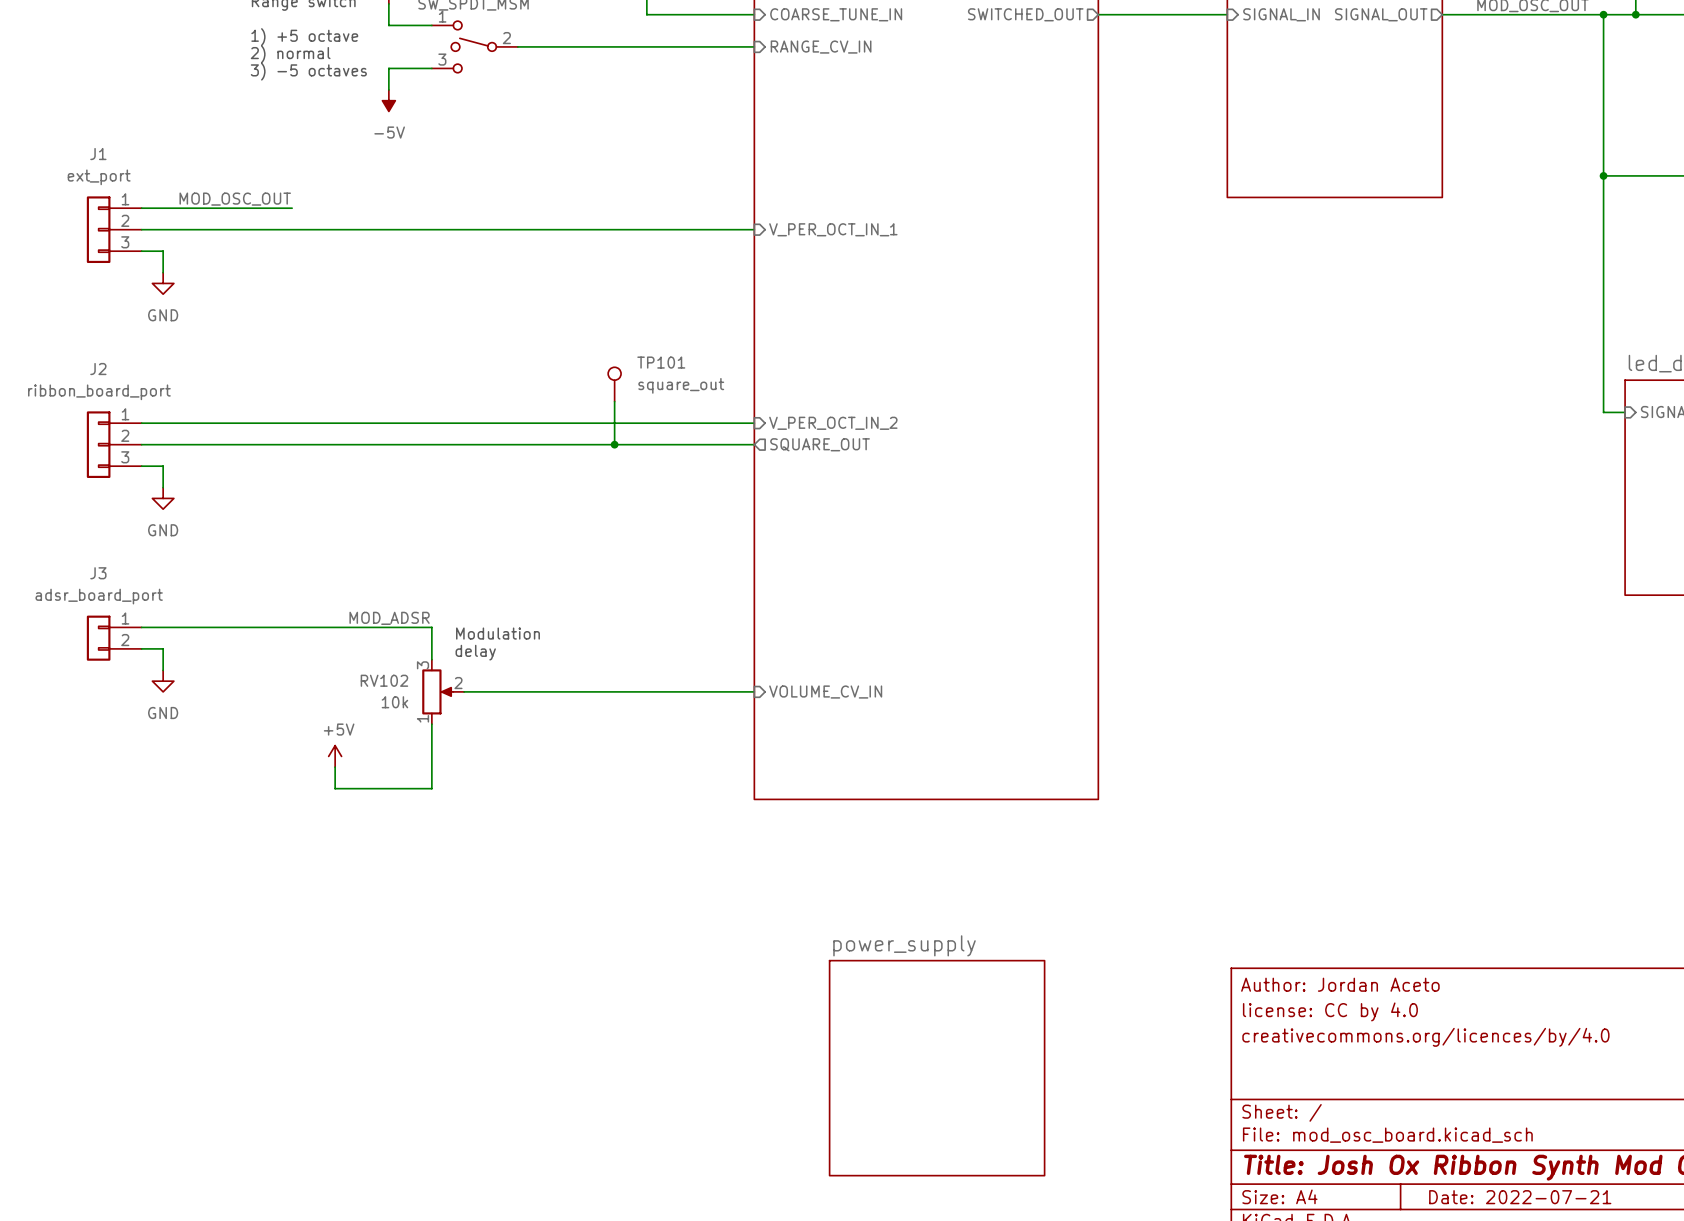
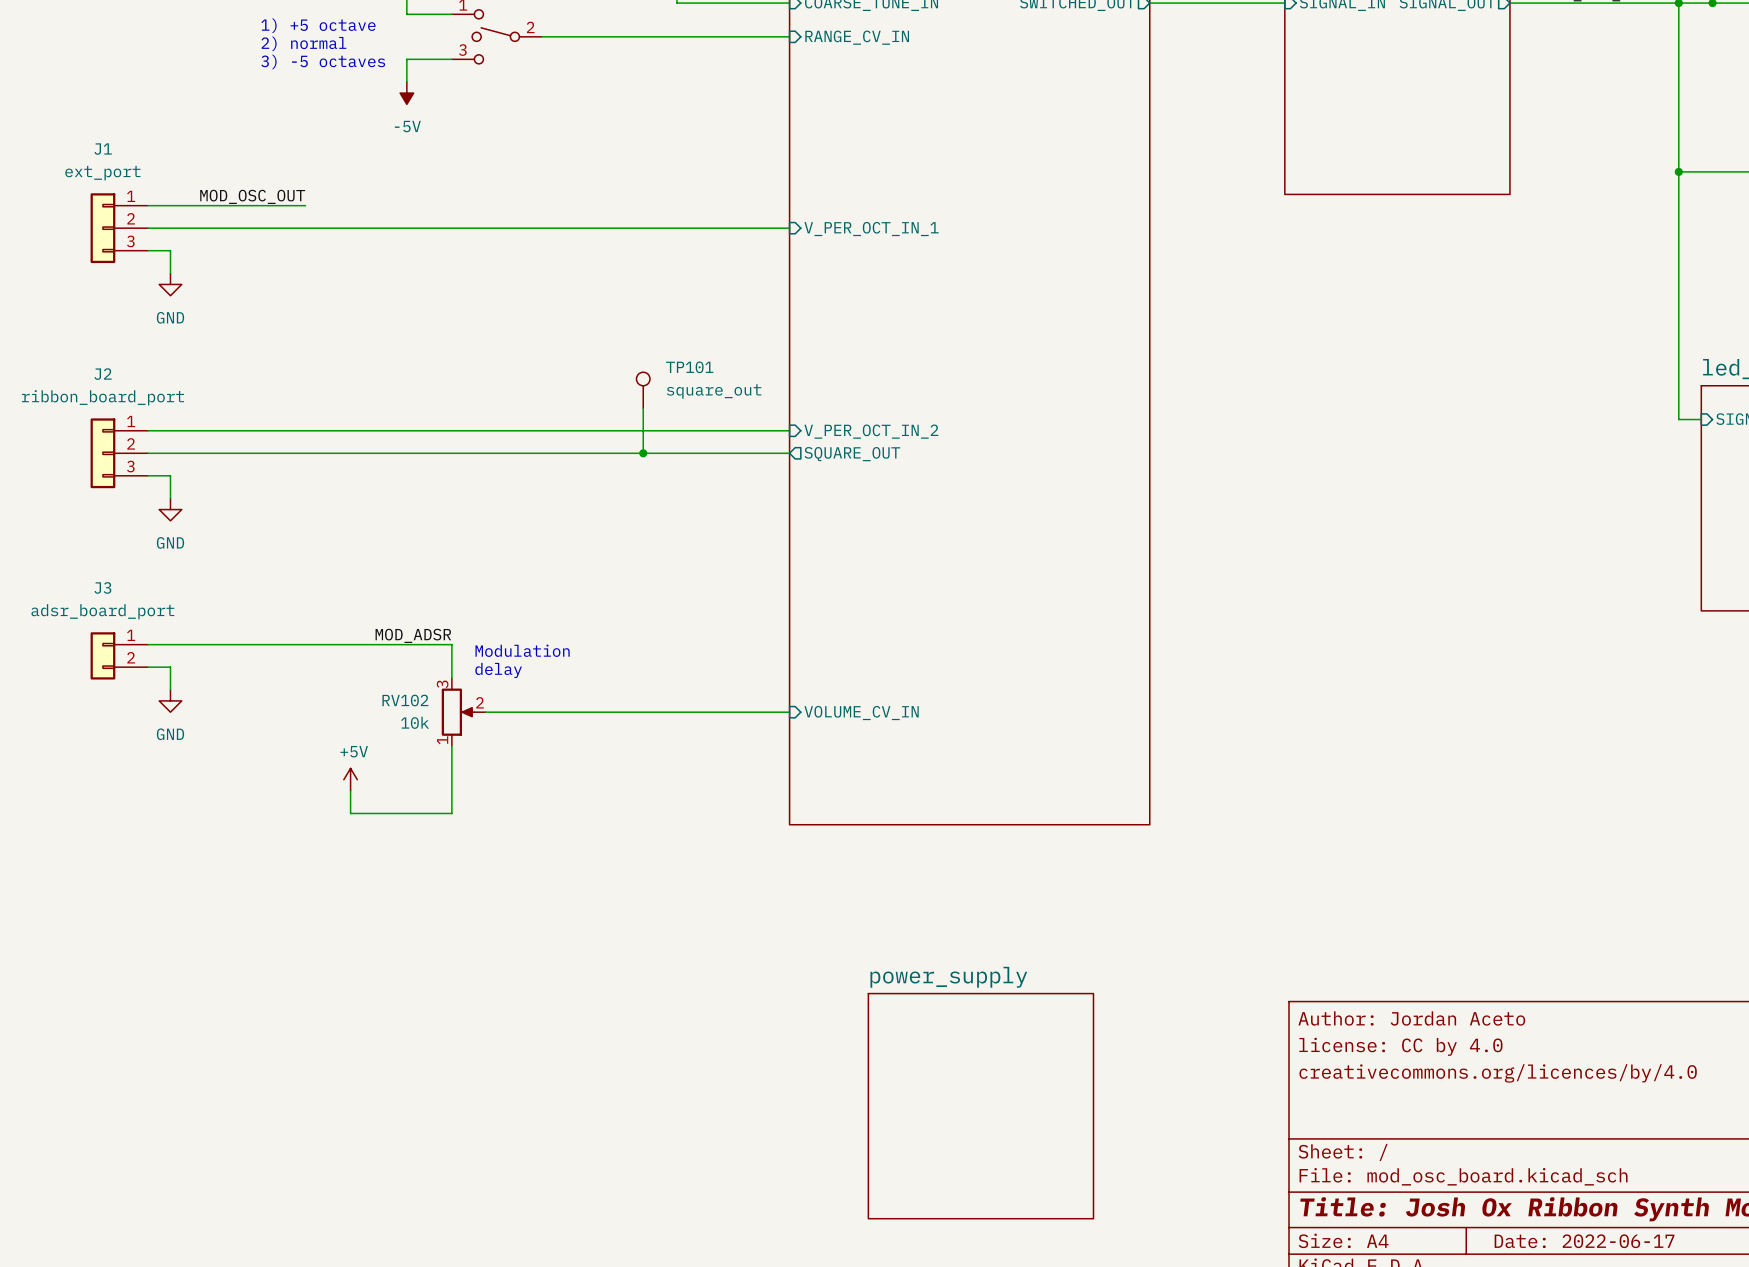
title block: Date: 2022-07-21 (1520, 1197) -> Date: 2022-06-17 (1584, 1241)

